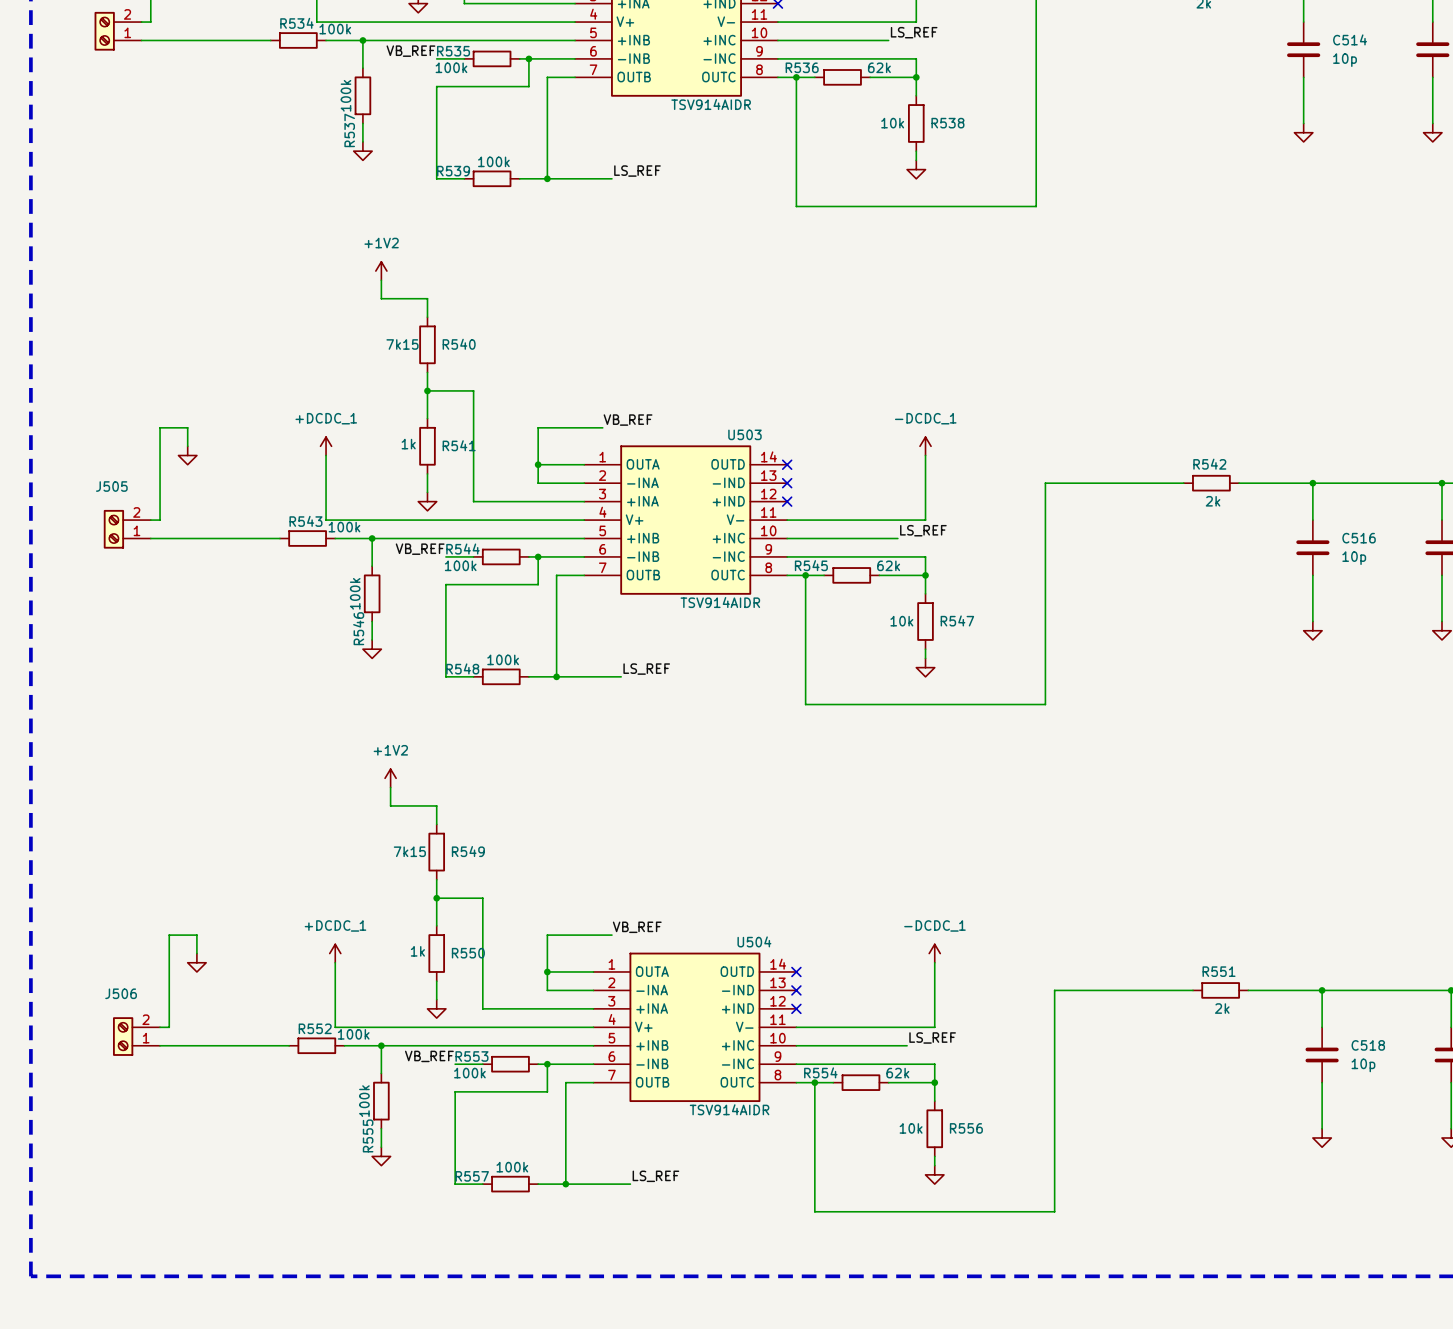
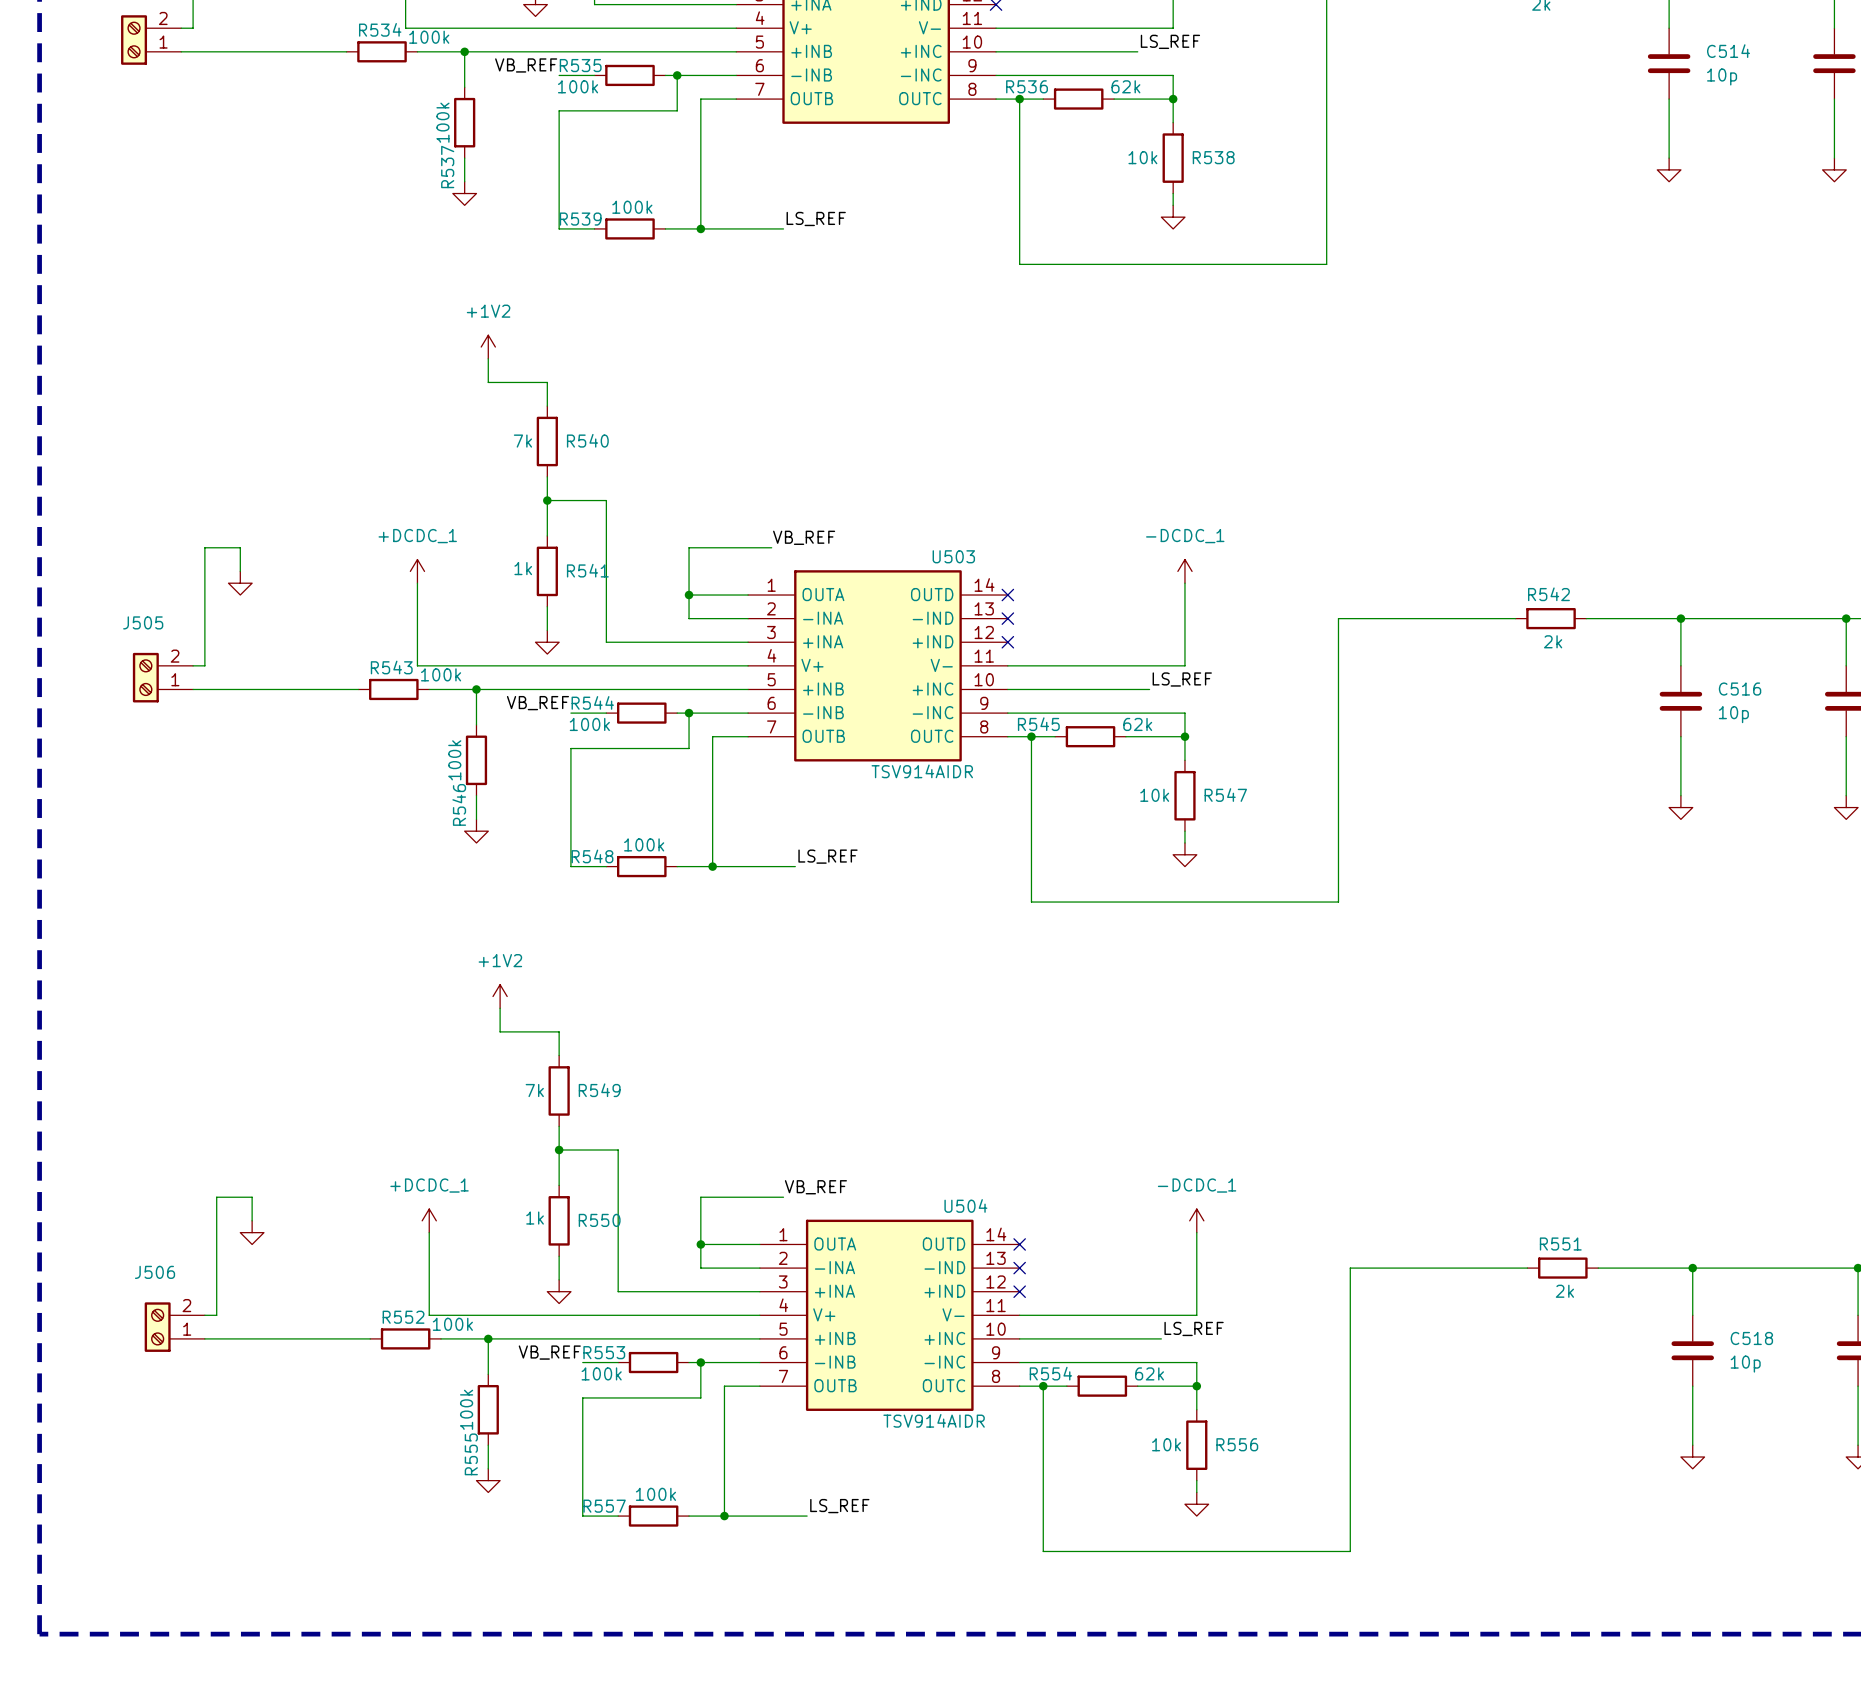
part value: TSV914AIDR (711, 104) -> none
R540 value: 7k15 (402, 344) -> 7k (522, 441)
R549 value: 7k15 (409, 851) -> 7k (534, 1090)

